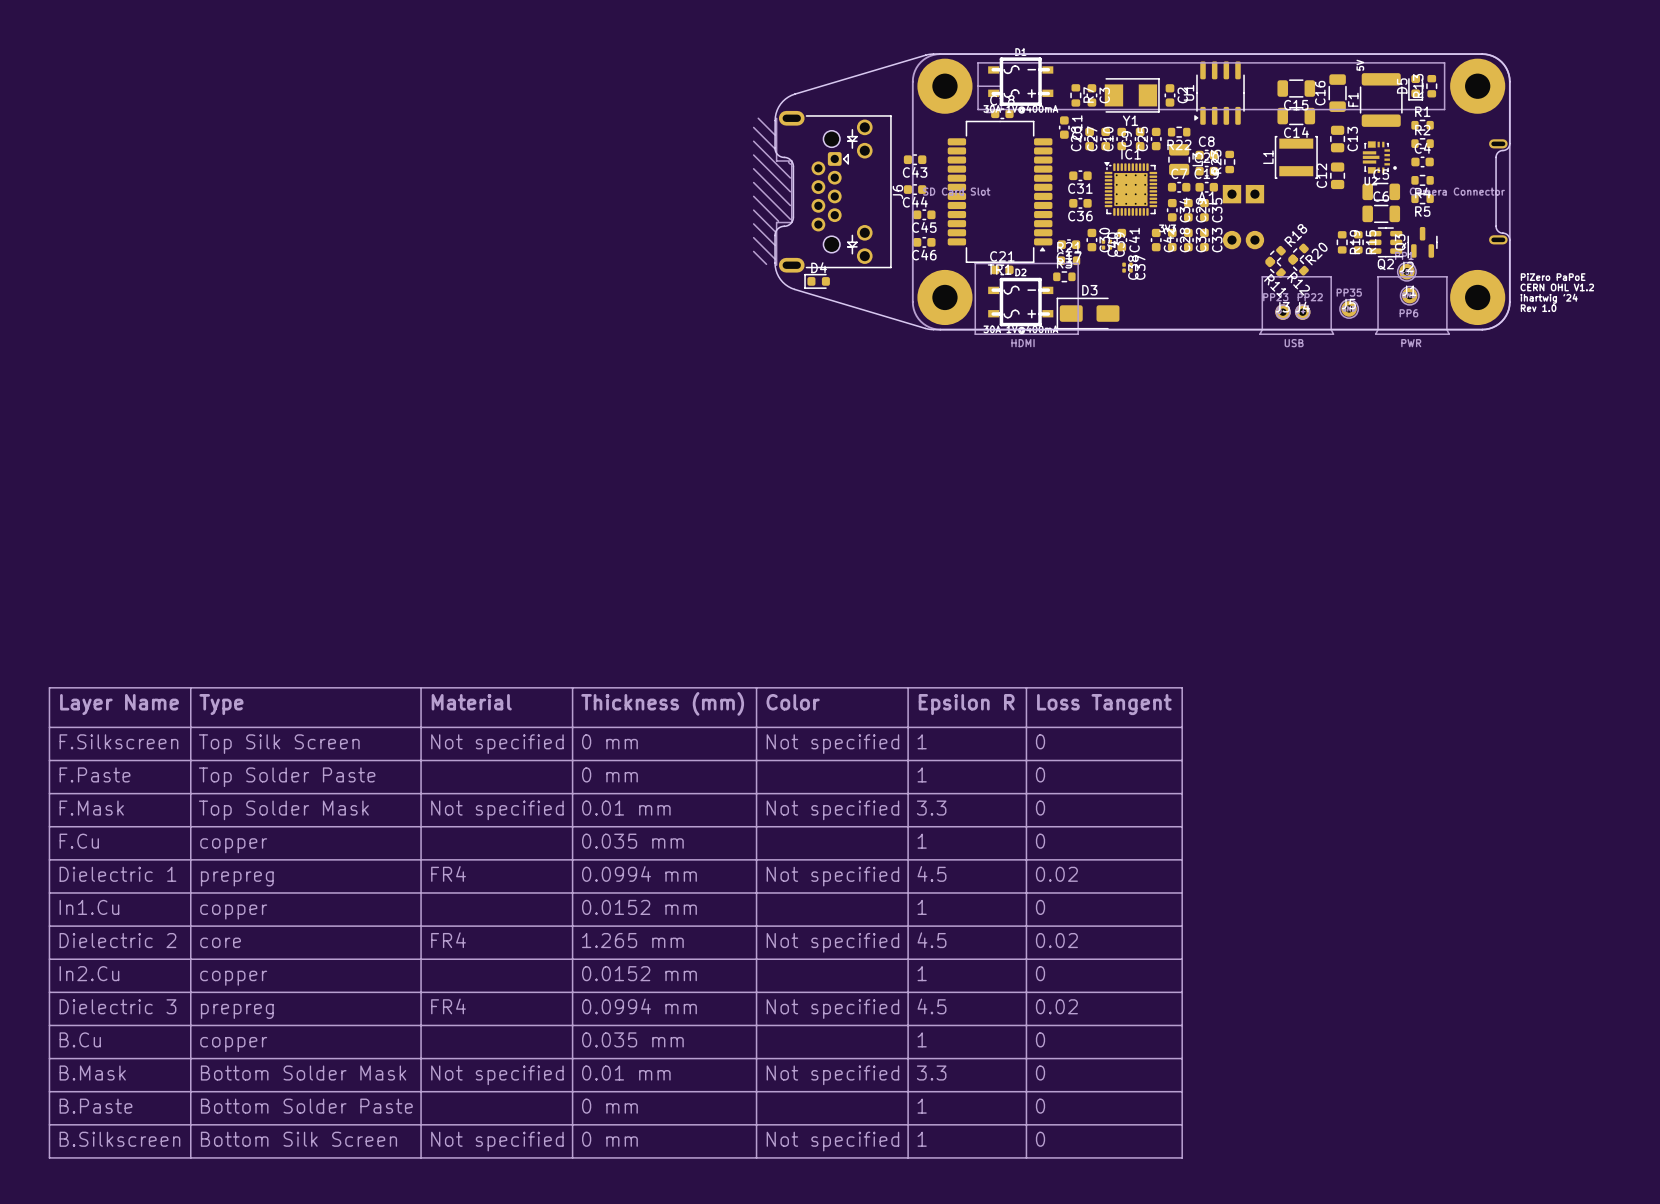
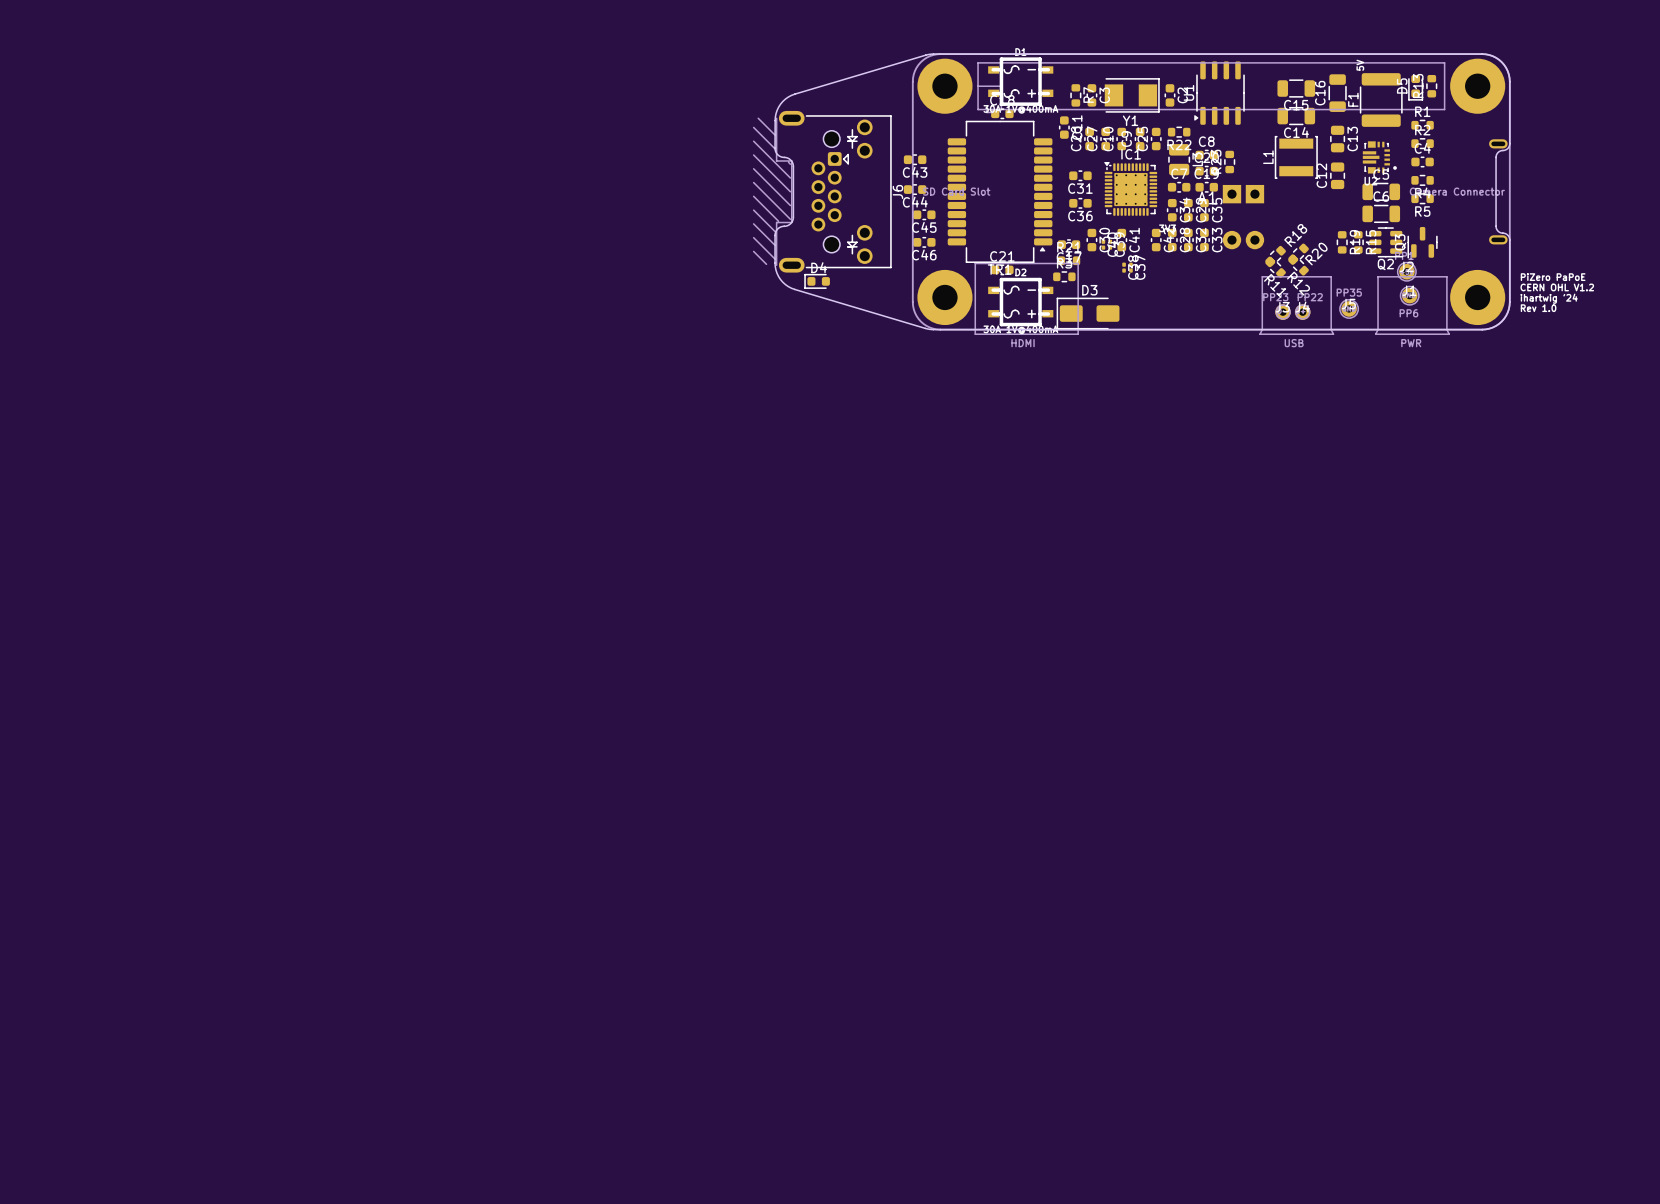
line: (49, 687) (49, 1157) (1182, 1157) (1182, 687) (49, 687) -> none
line: (190, 687) (190, 1157) -> none
line: (421, 687) (421, 1157) -> none
line: (572, 687) (572, 1157) -> none
line: (756, 687) (756, 1157) -> none
line: (908, 687) (908, 1157) -> none
line: (1026, 687) (1026, 1157) -> none
text: Material (471, 702) -> none
text: Color (793, 702) -> none
text: Thickness (mm) (662, 703) -> none
text: Layer Name (119, 704) -> none
text: Type (221, 704) -> none
text: Epsilon R (966, 704) -> none
text: Loss Tangent (1104, 704) -> none
line: (49, 727) (1182, 727) -> none
text: F.Silkscreen (118, 741) -> none
text: 0 mm (609, 741) -> none
text: 1 (922, 741) -> none
text: 0 (1040, 741) -> none
text: Top Silk Screen (279, 744) -> none
text: Not specified (497, 744) -> none
text: Not specified (832, 744) -> none
line: (49, 760) (1182, 760) -> none
text: F.Paste (95, 774) -> none
text: 0 mm (609, 774) -> none
text: 1 (922, 774) -> none
text: 0 (1040, 774) -> none
text: Top Solder Paste (287, 777) -> none
line: (49, 793) (1182, 793) -> none
text: F.Mask (91, 808) -> none
text: 0.01 mm (626, 808) -> none
text: 3.3 (931, 808) -> none
text: 0 (1040, 808) -> none
text: Top Solder Mask (283, 810) -> none
text: Not specified (497, 810) -> none
text: Not specified (832, 810) -> none
line: (49, 826) (1182, 826) -> none
text: F.Cu (79, 841) -> none
text: 0.035 mm (632, 841) -> none
text: 1 (922, 841) -> none
text: 0 (1040, 841) -> none
text: copper (233, 845) -> none
line: (49, 859) (1182, 859) -> none
text: FR4 (448, 873) -> none
text: 0.0994 mm (639, 873) -> none
text: 4.5 (931, 873) -> none
text: Dielectric 1 (117, 874) -> none
text: 0.02 (1056, 874) -> none
text: Not specified (832, 876) -> none
text: prepreg (237, 878) -> none
line: (49, 892) (1182, 892) -> none
text: In1.Cu (89, 907) -> none
text: 0.0152 mm (639, 907) -> none
text: 1 (922, 907) -> none
text: 0 (1040, 907) -> none
text: copper (233, 912) -> none
line: (49, 926) (1182, 926) -> none
text: Dielectric 2 (117, 940) -> none
text: FR4 (448, 940) -> none
text: 1.265 mm (632, 940) -> none
text: 4.5 (931, 940) -> none
text: 0.02 (1056, 940) -> none
text: core (220, 942) -> none
text: Not specified (832, 942) -> none
line: (49, 959) (1182, 959) -> none
text: In2.Cu (89, 973) -> none
text: 0.0152 mm (639, 973) -> none
text: 1 (922, 973) -> none
text: 0 (1040, 973) -> none
text: copper (233, 978) -> none
line: (49, 992) (1182, 992) -> none
text: Dielectric 3 (117, 1006) -> none
text: FR4 (448, 1006) -> none
text: 0.0994 mm (639, 1006) -> none
text: 4.5 (931, 1006) -> none
text: 0.02 (1056, 1006) -> none
text: Not specified (832, 1009) -> none
text: prepreg (237, 1011) -> none
line: (49, 1025) (1182, 1025) -> none
text: B.Cu (80, 1039) -> none
text: 0.035 mm (632, 1039) -> none
text: 1 (922, 1039) -> none
text: 0 (1040, 1039) -> none
text: copper (233, 1044) -> none
line: (49, 1058) (1182, 1058) -> none
text: B.Mask (92, 1073) -> none
text: Bottom Solder Mask (303, 1073) -> none
text: 0.01 mm (626, 1073) -> none
text: 3.3 (931, 1073) -> none
text: 0 (1040, 1073) -> none
text: Not specified (497, 1075) -> none
text: Not specified (832, 1075) -> none
line: (49, 1091) (1182, 1091) -> none
text: B.Paste (95, 1106) -> none
text: Bottom Solder Paste (306, 1106) -> none
text: 0 mm (609, 1106) -> none
text: 1 (922, 1106) -> none
text: 0 (1040, 1106) -> none
line: (49, 1124) (1182, 1124) -> none
text: B.Silkscreen (119, 1139) -> none
text: Bottom Silk Screen (298, 1139) -> none
text: 0 mm (609, 1139) -> none
text: 1 (922, 1139) -> none
text: 0 (1040, 1139) -> none
text: Not specified (497, 1141) -> none
text: Not specified (832, 1141) -> none

